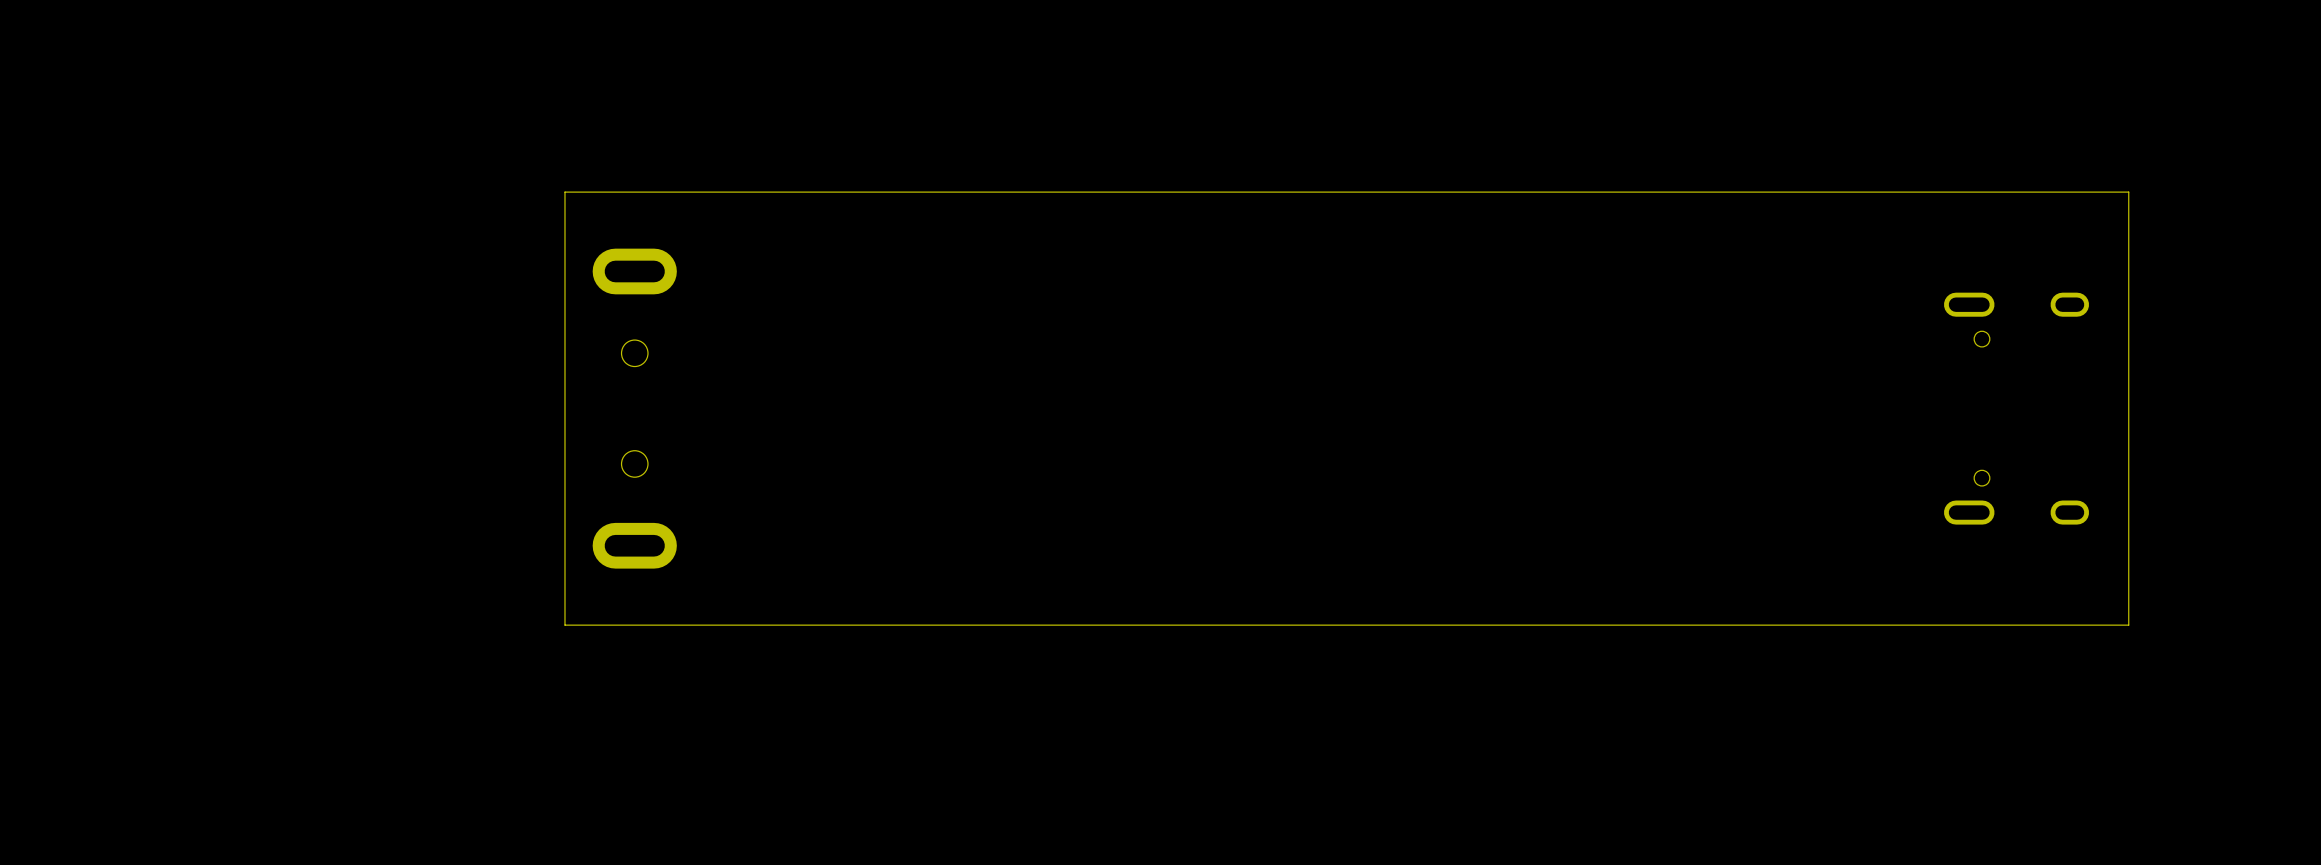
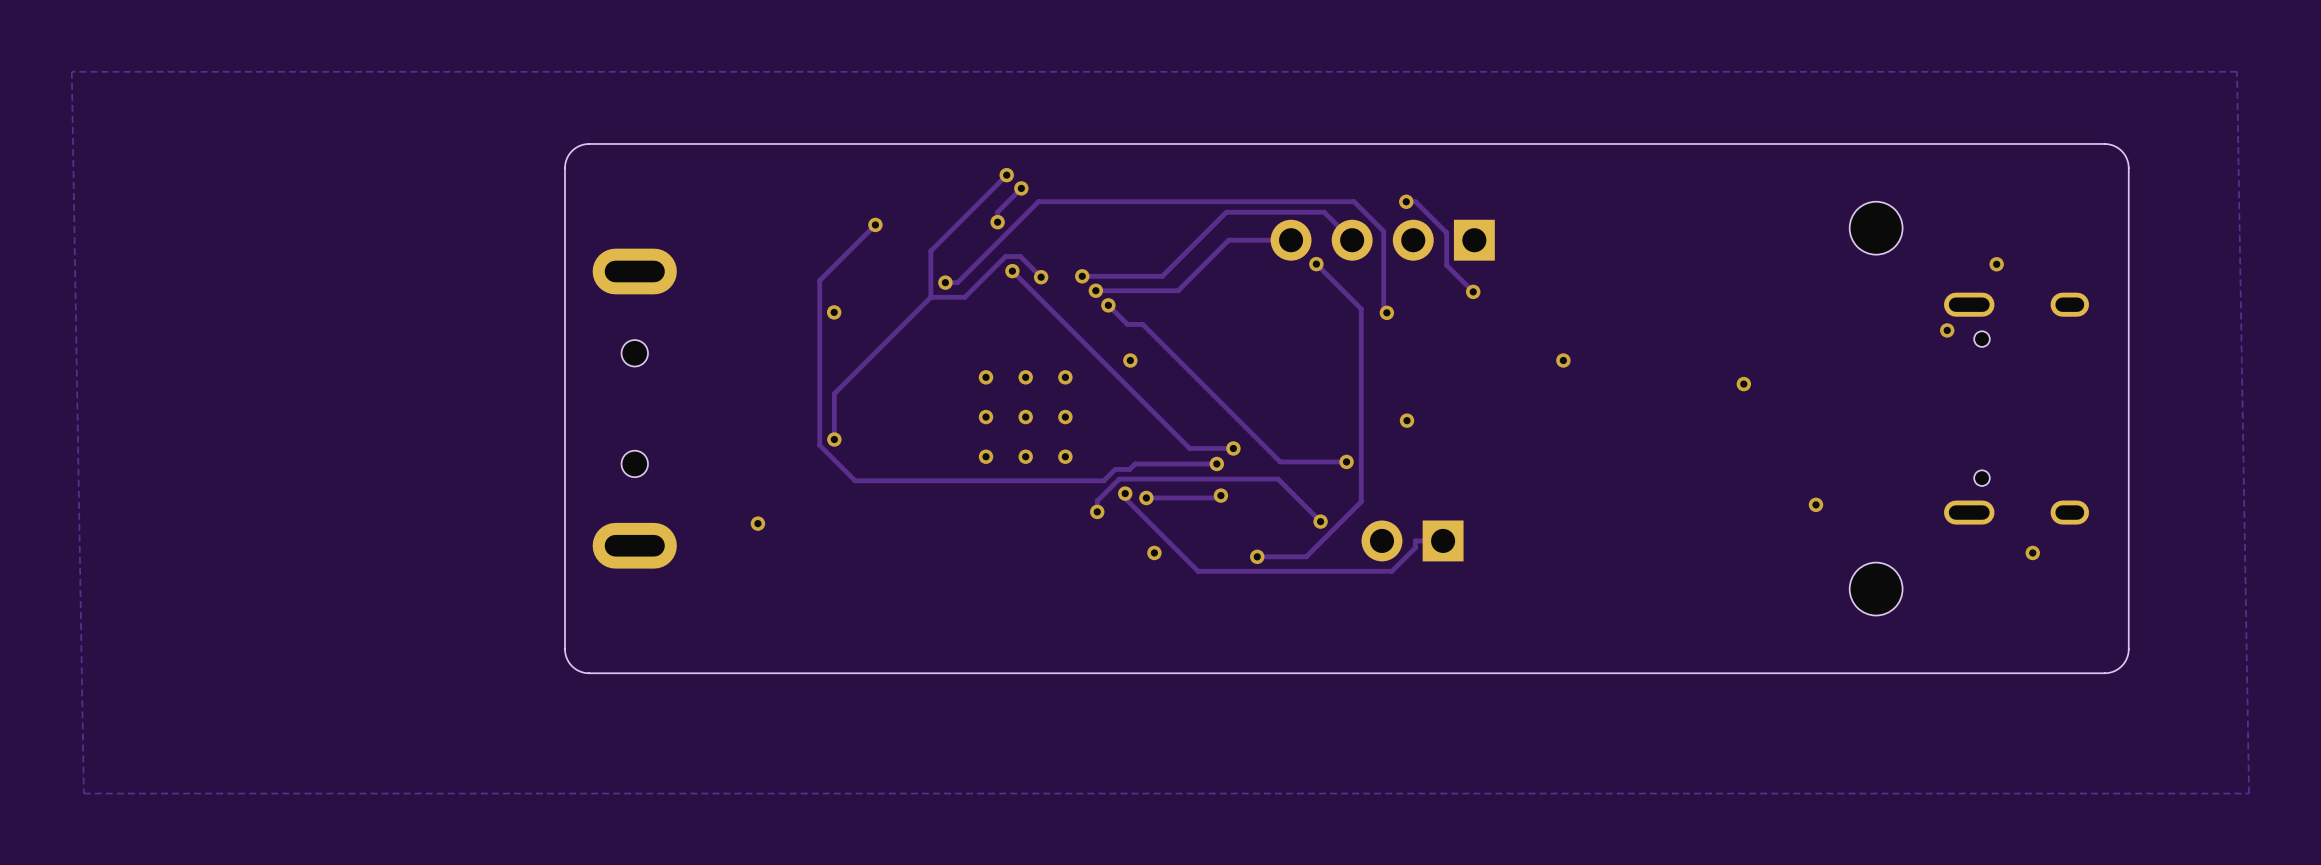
zone outline: none -> (2237, 71) (71, 71) (83, 793) (2249, 793) (2237, 71)
track: none -> (1006, 175) (930, 251) (930, 297)
via: none -> (1006, 175)
track: none -> (1021, 188) (997, 212) (997, 222)
via: none -> (1021, 188)
board edge: (2128, 192) (564, 192) -> (2128, 192) (2128, 165) (2126, 157) (2117, 147) (2104, 143) (589, 143) (576, 147) (567, 157) (565, 165) (564, 192)
track: none -> (1406, 201) (1415, 201) (1446, 232) (1446, 265) (1473, 291)
via: none -> (1406, 201)
via: none -> (997, 222)
track: none -> (875, 224) (819, 280) (819, 445) (855, 480) (1103, 480) (1115, 469) (1129, 469) (1135, 463) (1216, 463)
via: none -> (875, 224)
part: none -> (1876, 228)
track: none -> (1291, 240) (1228, 240) (1178, 290) (1095, 290)
track: none -> (1352, 240) (1324, 212) (1226, 212) (1162, 276) (1082, 276)
part: none -> (1382, 240)
track: none -> (1316, 264) (1361, 308) (1361, 501) (1306, 556) (1257, 556)
via: none -> (1316, 264)
via: none -> (1996, 264)
track: none -> (1012, 271) (1189, 448) (1233, 448)
via: none -> (1012, 271)
via: none -> (1082, 276)
track: none -> (1041, 277) (1020, 256) (1005, 256) (964, 297) (930, 297)
via: none -> (1041, 277)
track: none -> (945, 282) (957, 282) (1038, 201) (1354, 201) (1383, 231) (1383, 309) (1386, 312)
via: none -> (945, 282)
via: none -> (1095, 290)
via: none -> (1473, 291)
track: none -> (930, 297) (834, 393) (834, 439)
track: none -> (1108, 305) (1127, 324) (1142, 324) (1280, 461) (1346, 461)
via: none -> (1108, 305)
via: none -> (834, 312)
via: none -> (1386, 312)
via: none -> (1947, 330)
via: none -> (1130, 360)
via: none -> (1563, 360)
via: none -> (986, 377)
via: none -> (1025, 377)
via: none -> (1065, 377)
via: none -> (1743, 384)
via: none -> (986, 417)
via: none -> (1025, 417)
via: none -> (1065, 417)
via: none -> (1407, 420)
via: none -> (834, 439)
via: none -> (1233, 448)
via: none -> (986, 456)
via: none -> (1025, 456)
via: none -> (1065, 456)
via: none -> (1346, 461)
via: none -> (1216, 463)
track: none -> (1125, 493) (1125, 498) (1198, 571) (1391, 571) (1415, 547) (1415, 540) (1443, 540)
via: none -> (1125, 493)
track: none -> (1220, 495) (1218, 497) (1146, 497)
via: none -> (1220, 495)
via: none -> (1146, 497)
via: none -> (1815, 504)
track: none -> (1097, 511) (1097, 501) (1119, 479) (1278, 479) (1320, 521)
via: none -> (1097, 511)
via: none -> (1320, 521)
via: none -> (757, 523)
part: none -> (1412, 540)
via: none -> (1154, 552)
via: none -> (2032, 552)
via: none -> (1257, 556)
part: none -> (1876, 589)
board edge: (2128, 625) (564, 625) -> (2128, 625) (2128, 651) (2126, 659) (2117, 669) (2104, 673) (589, 673) (576, 669) (567, 659) (565, 651) (564, 625)

